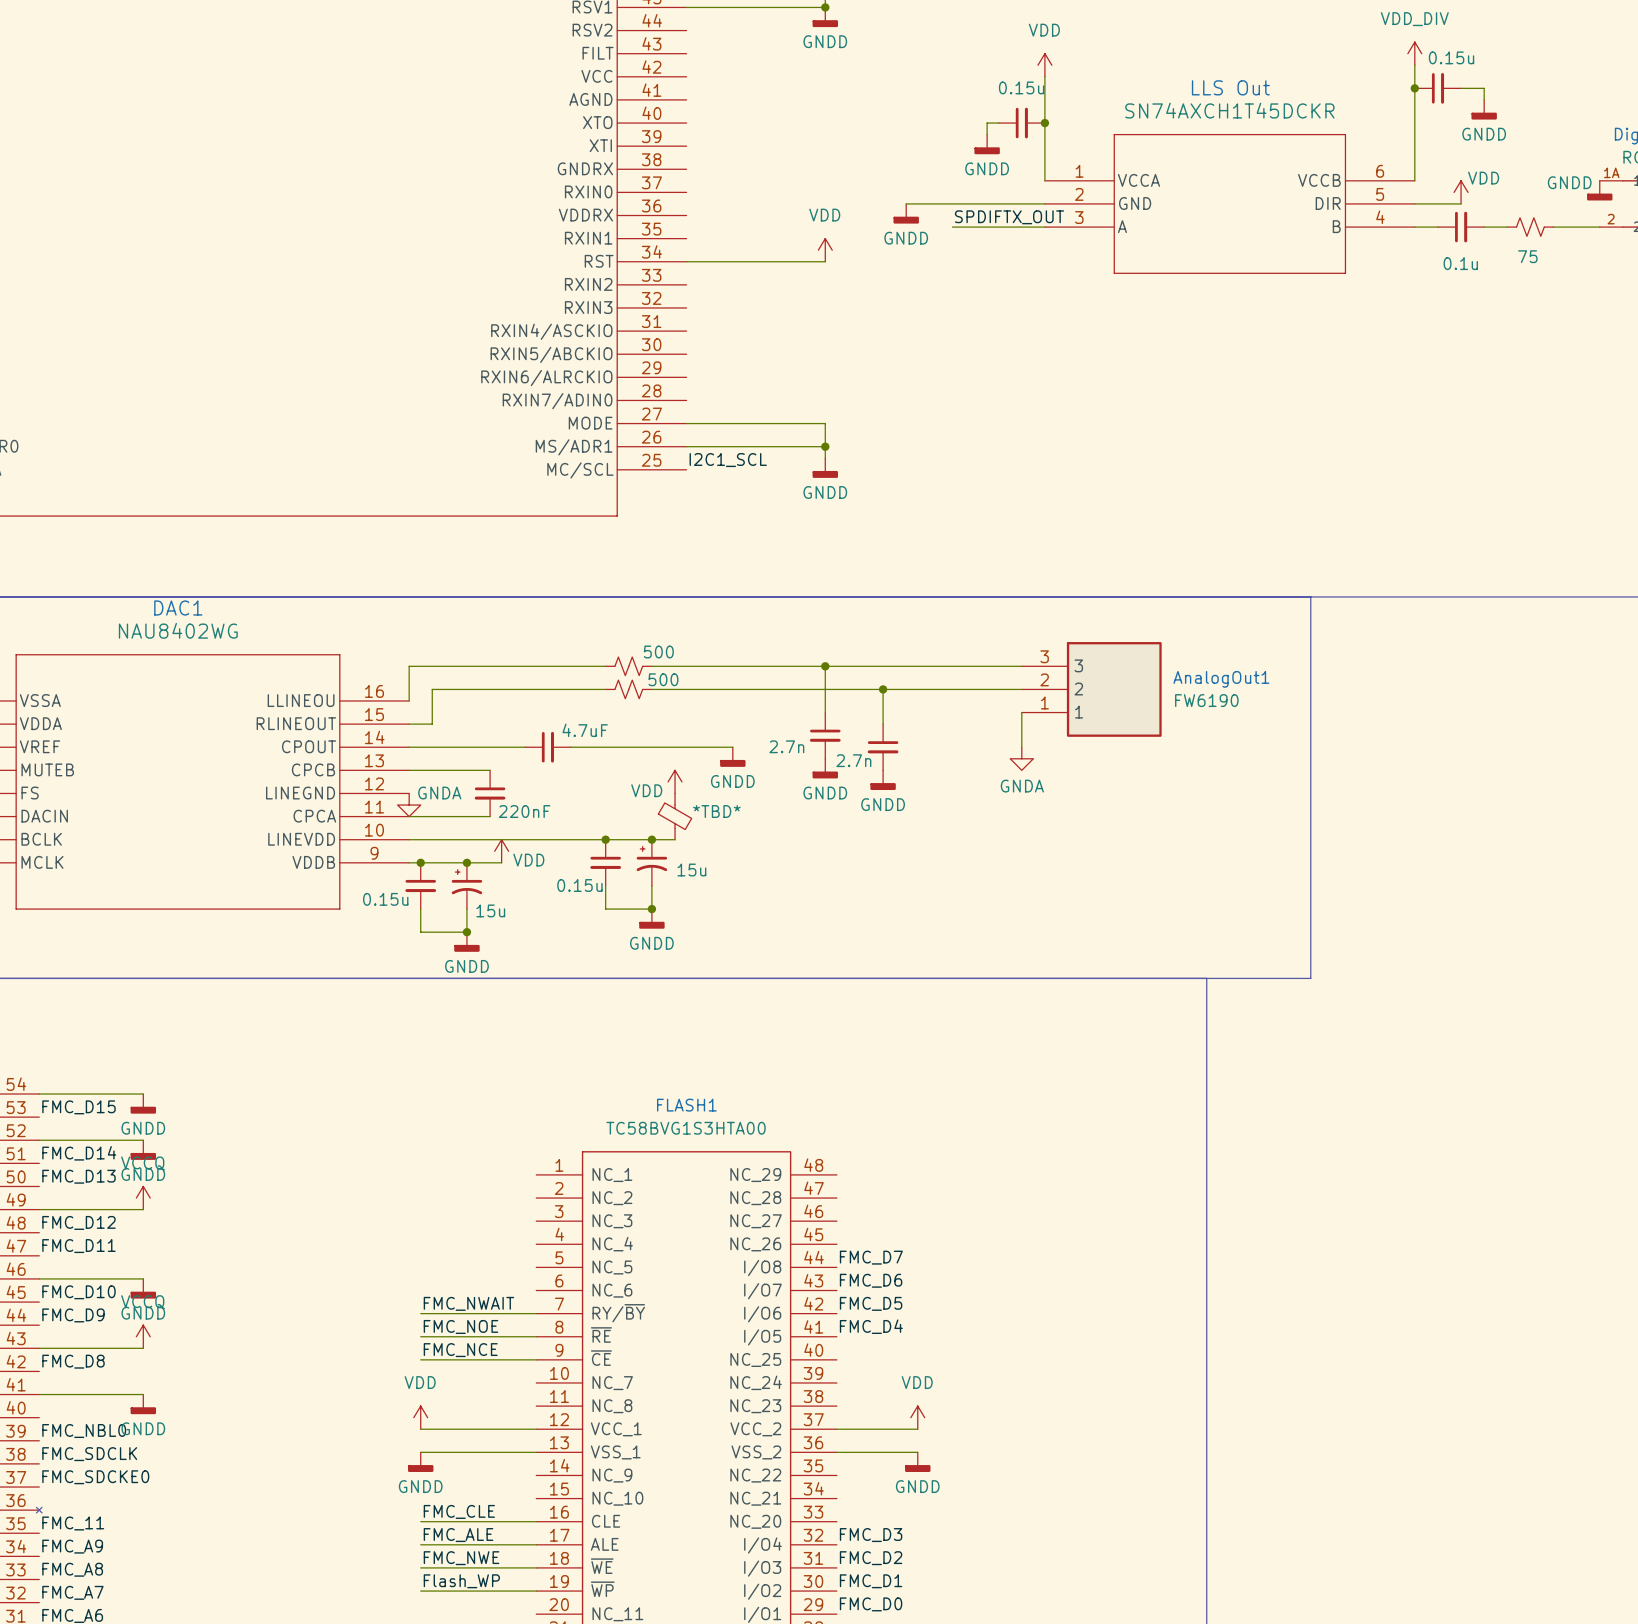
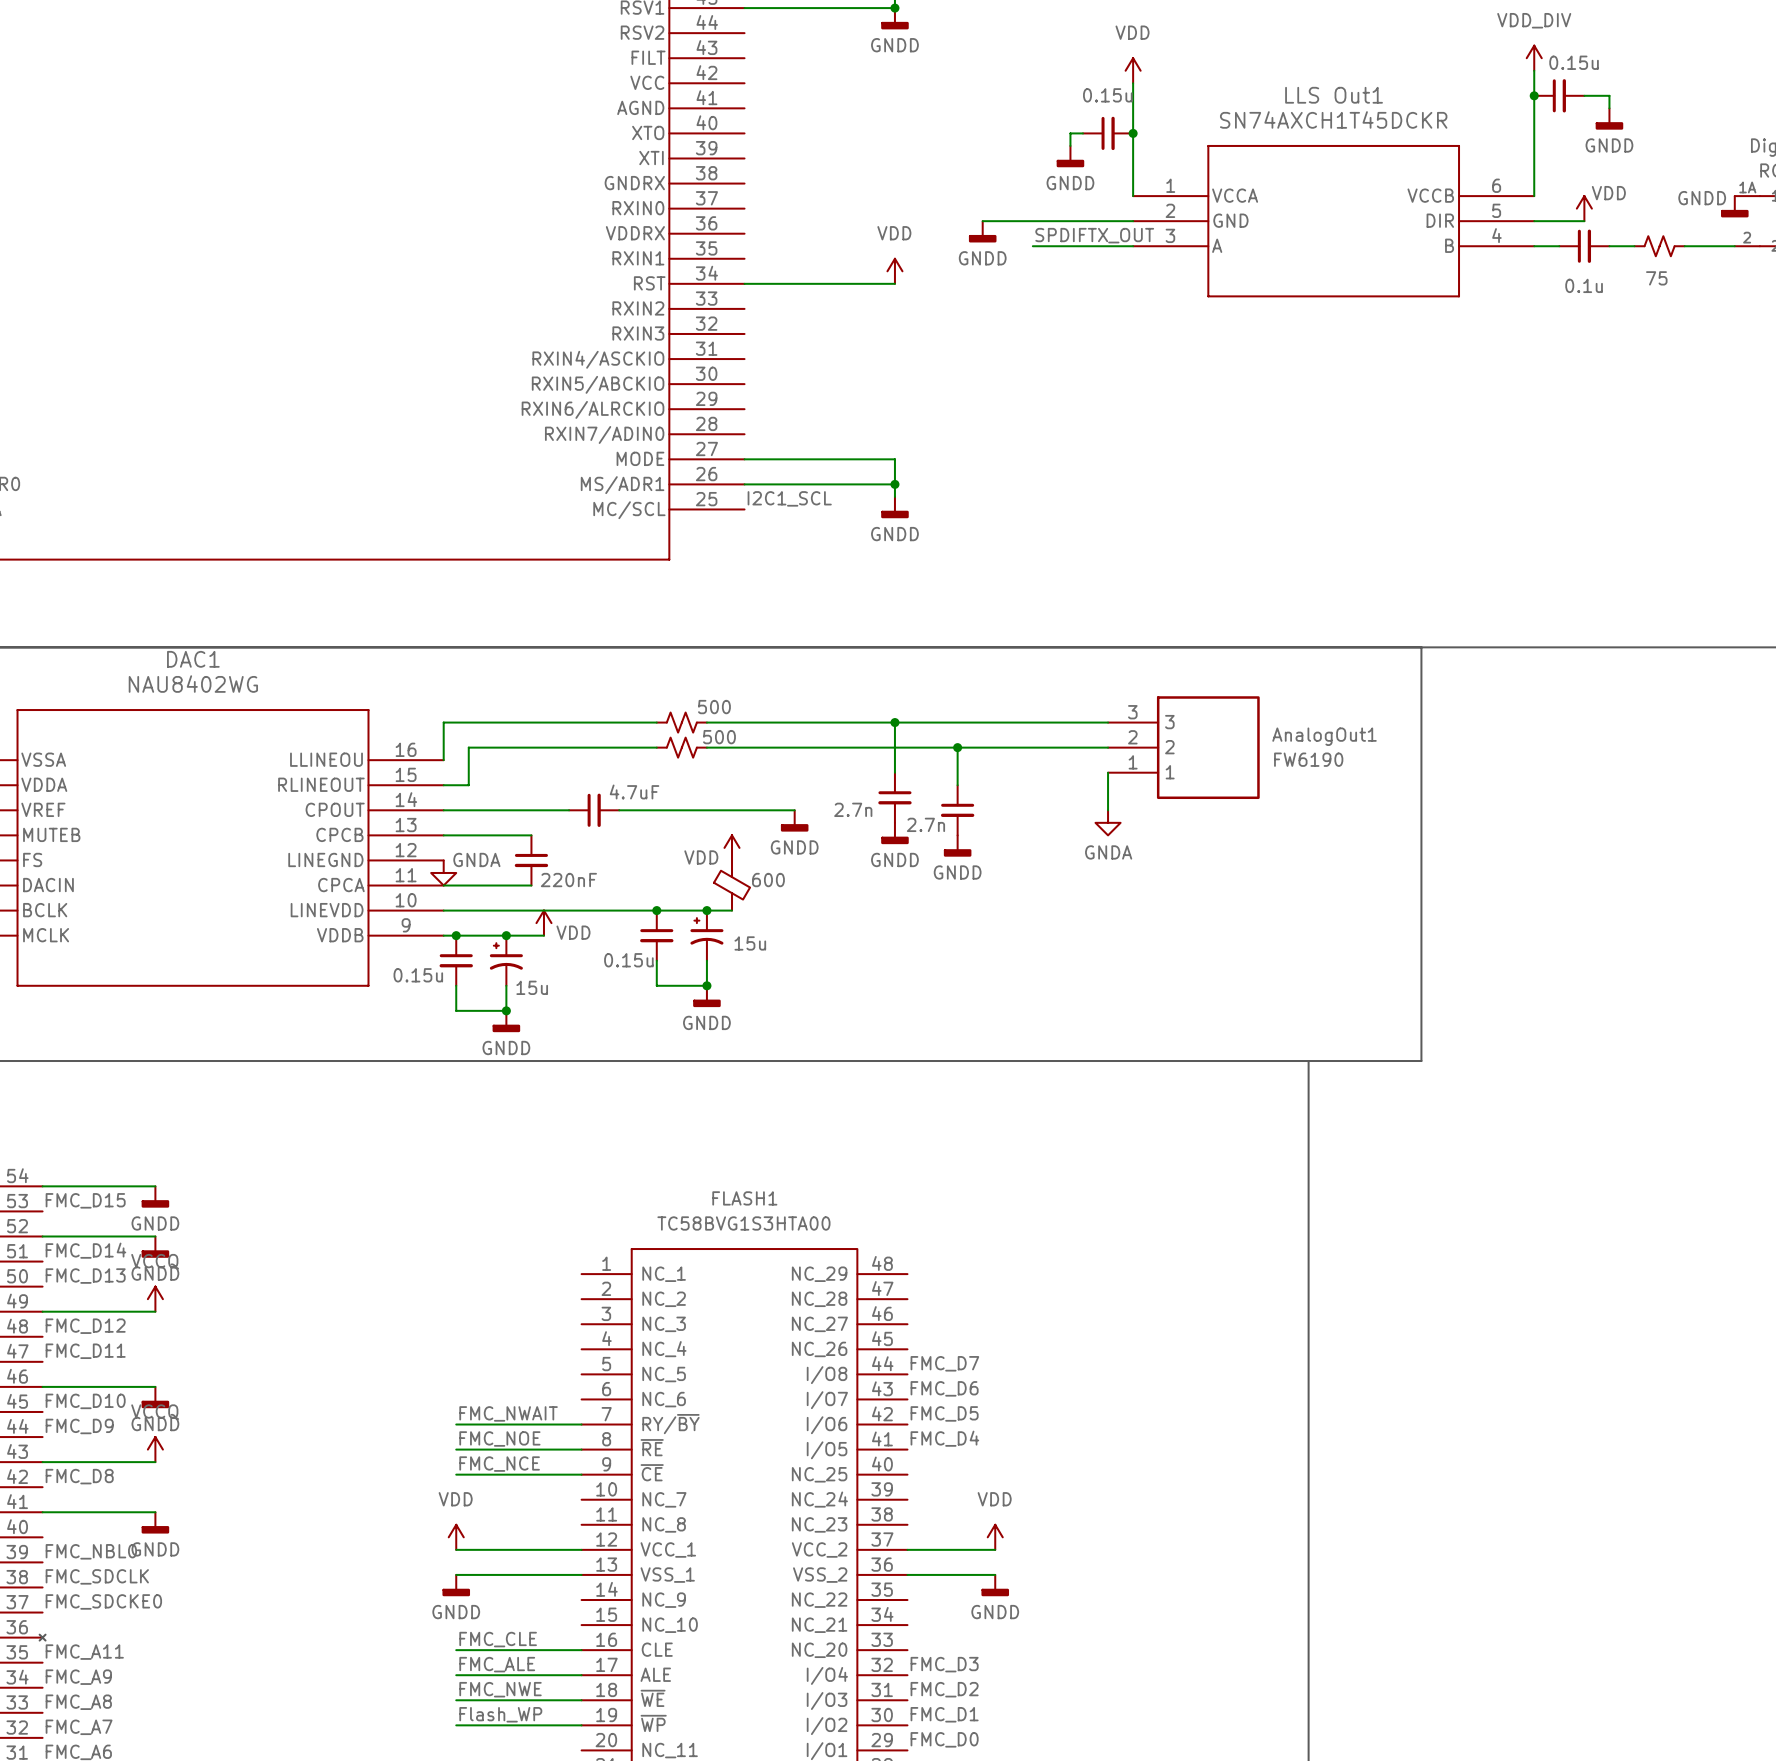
LLS Out name: LLS Out (1230, 87) -> LLS Out1 (1334, 95)
part value: *TBD* (716, 811) -> 600 (768, 880)
label: FMC_11 (73, 1523) -> FMC_A11 (84, 1652)

